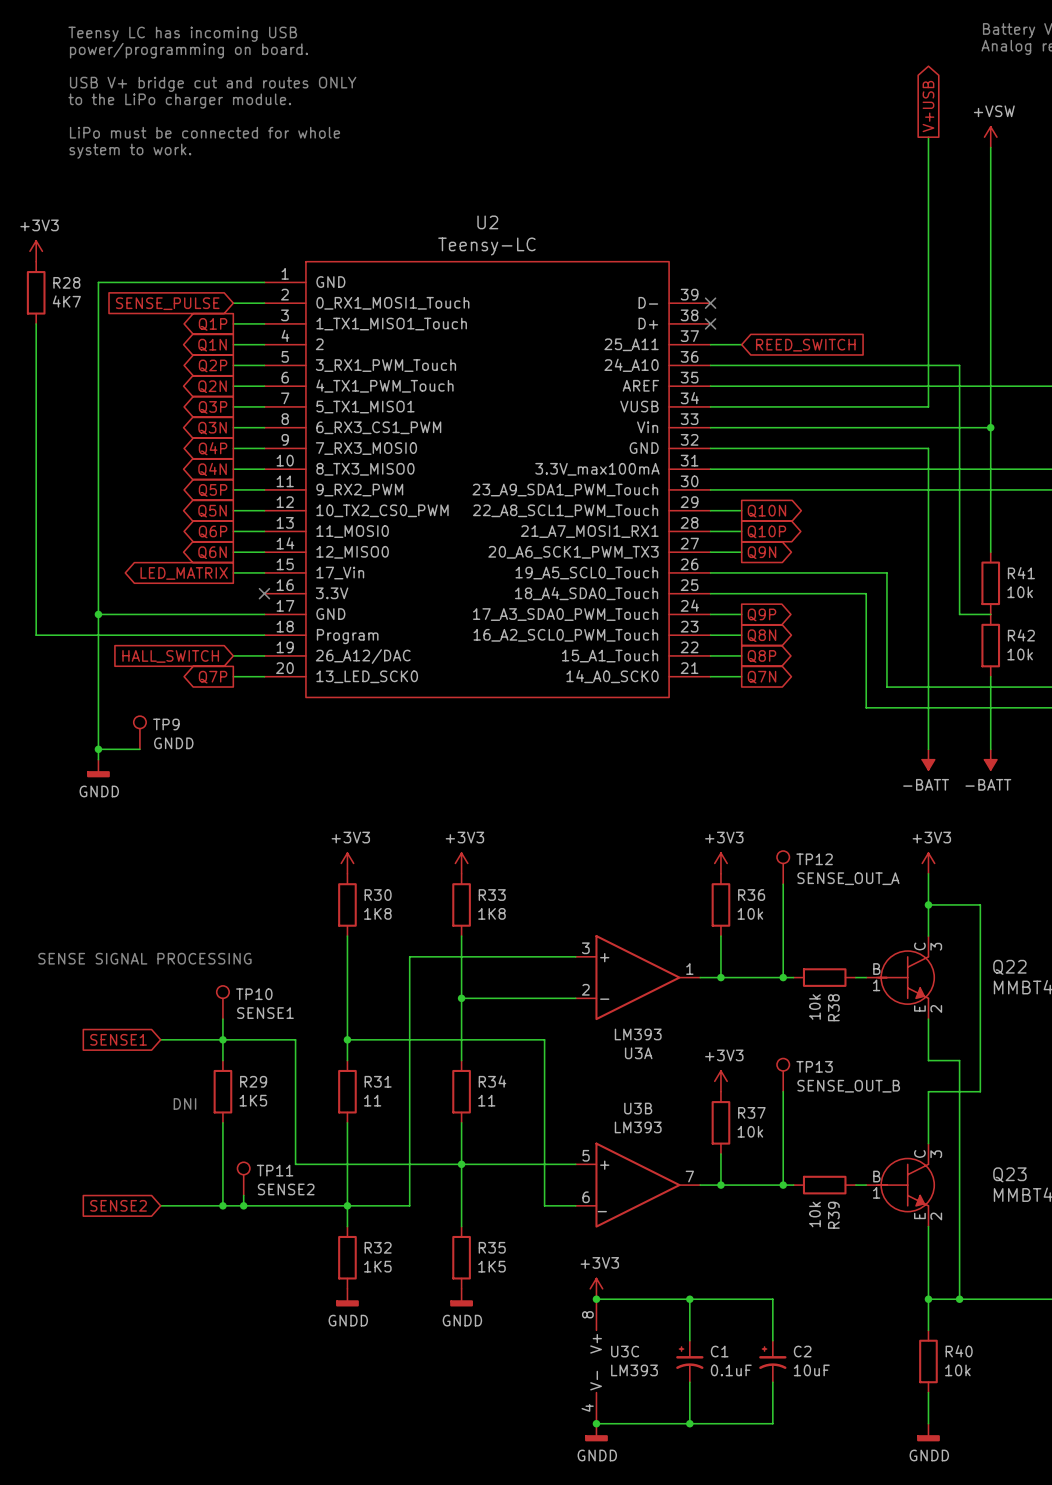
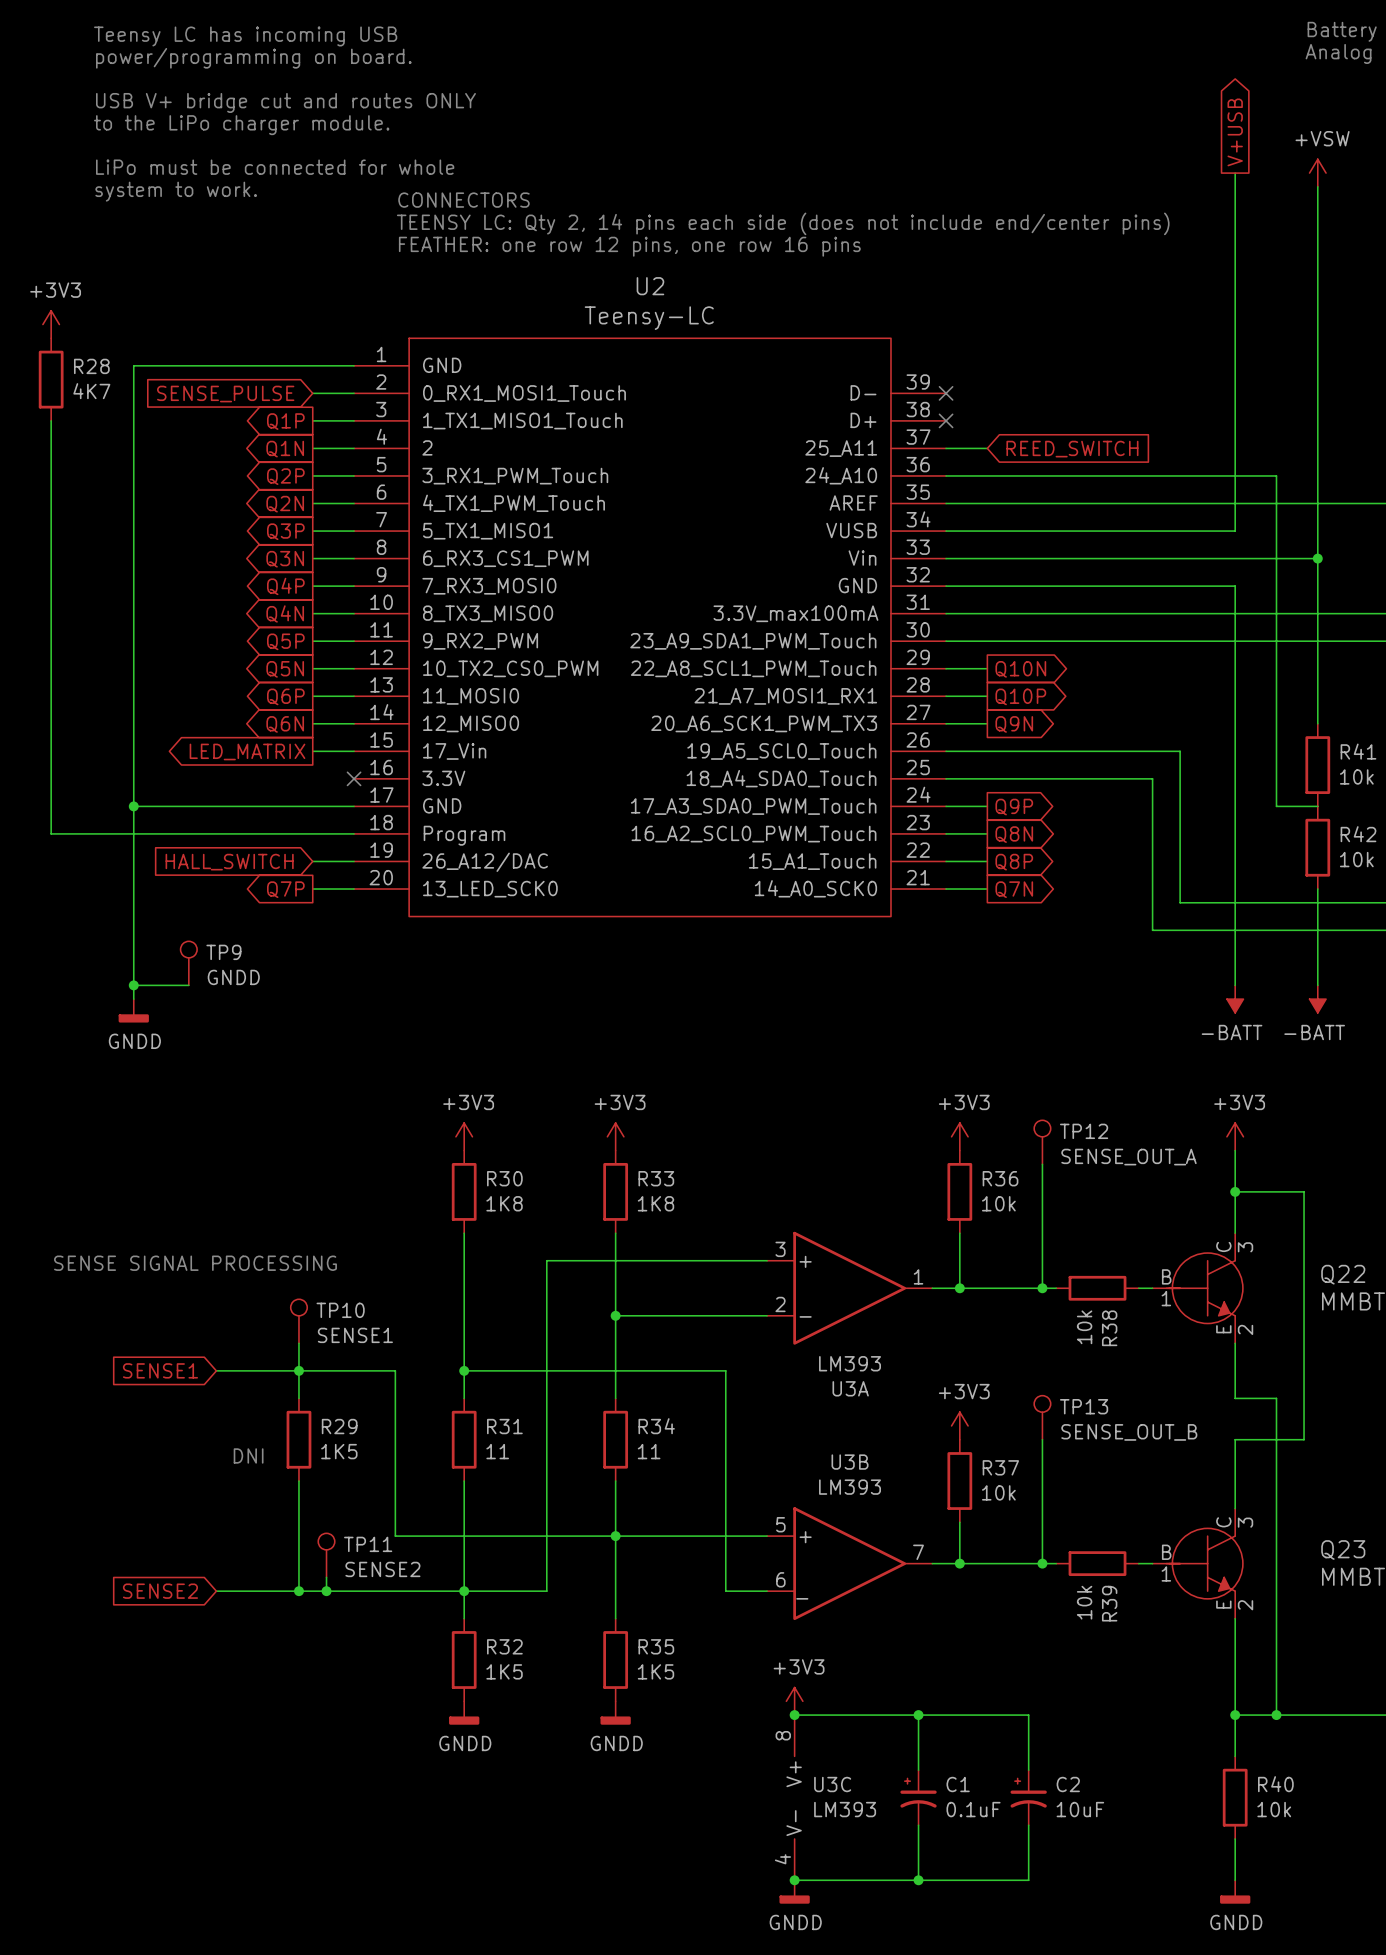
text: none -> CONNECTORS (463, 200)
text: none -> TEENSY LC: Qty 2, 14 pins each side (does not include end/center pins) (783, 223)
text: none -> FEATHER: one row 12 pins, one row 16 pins (629, 246)

